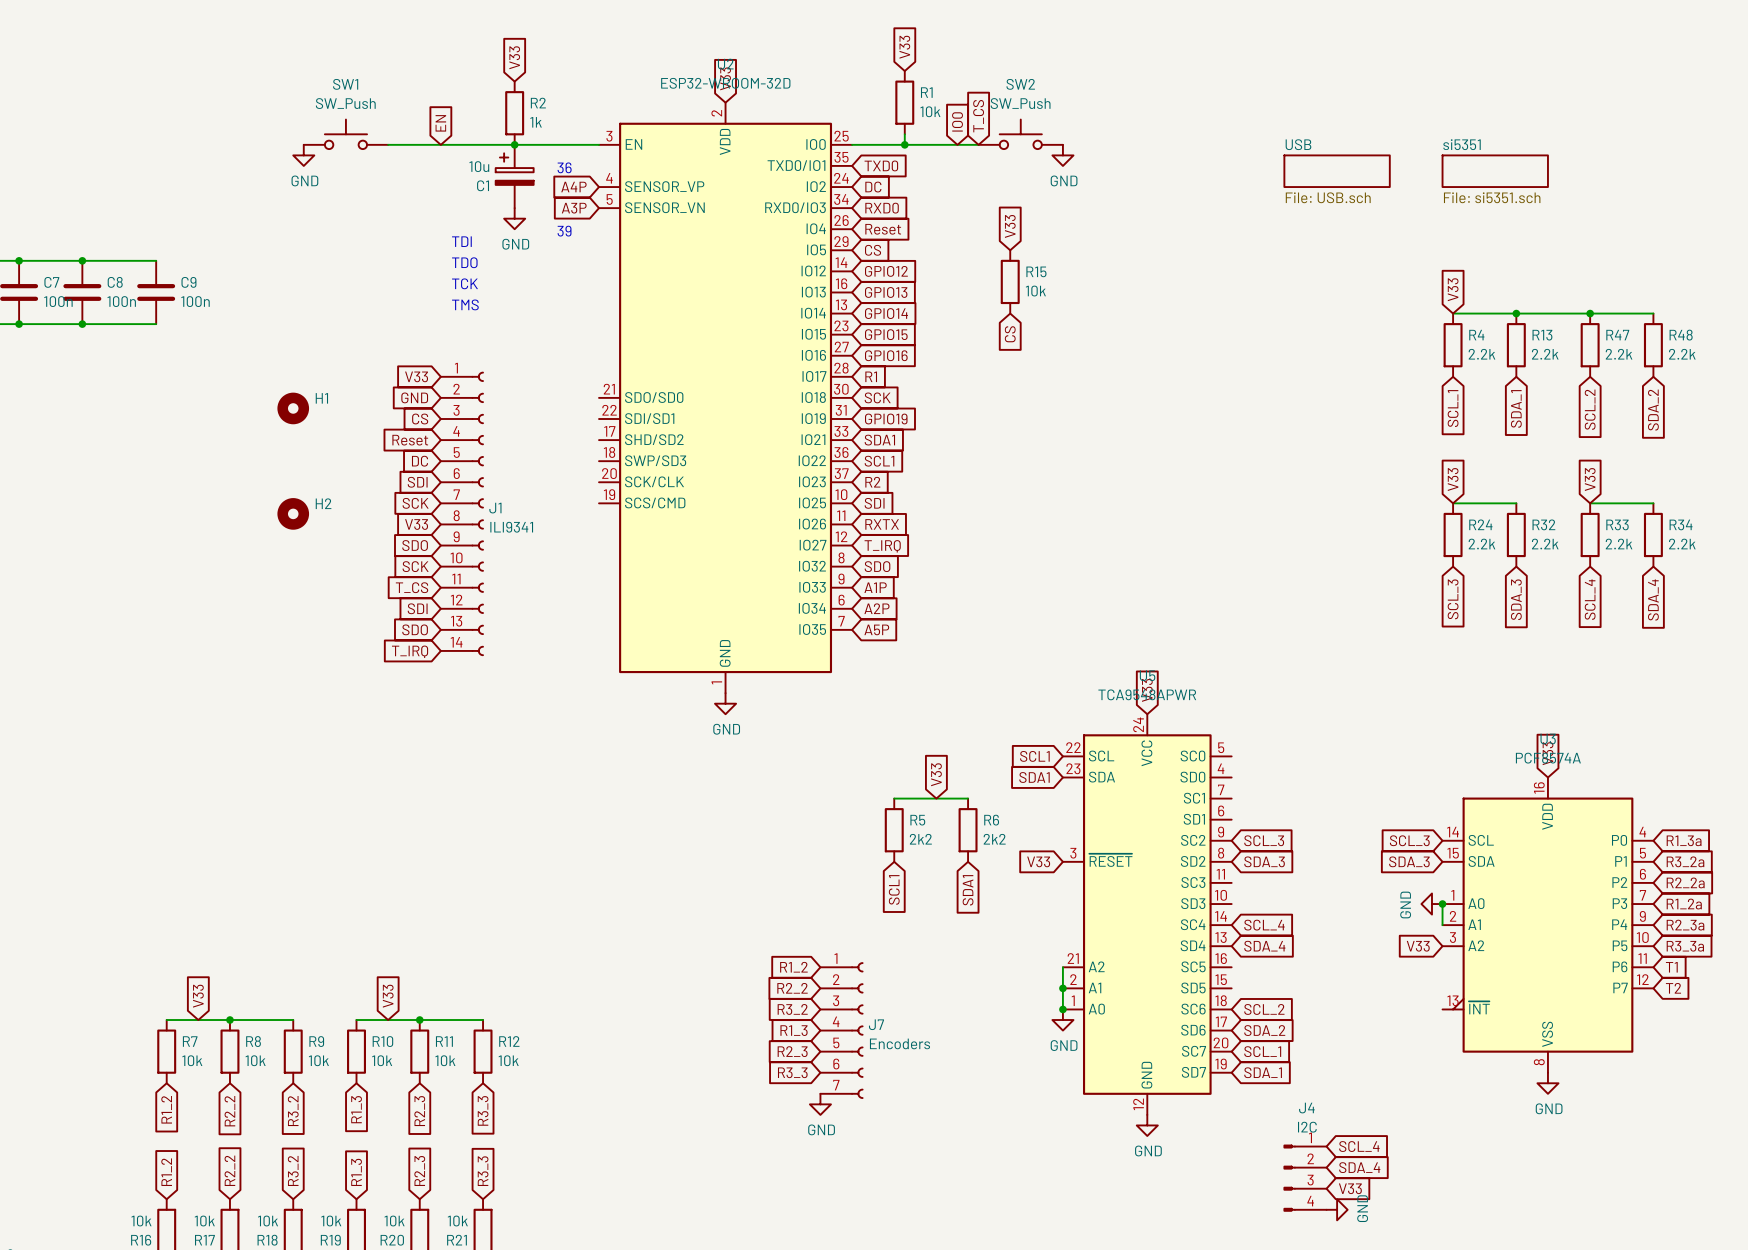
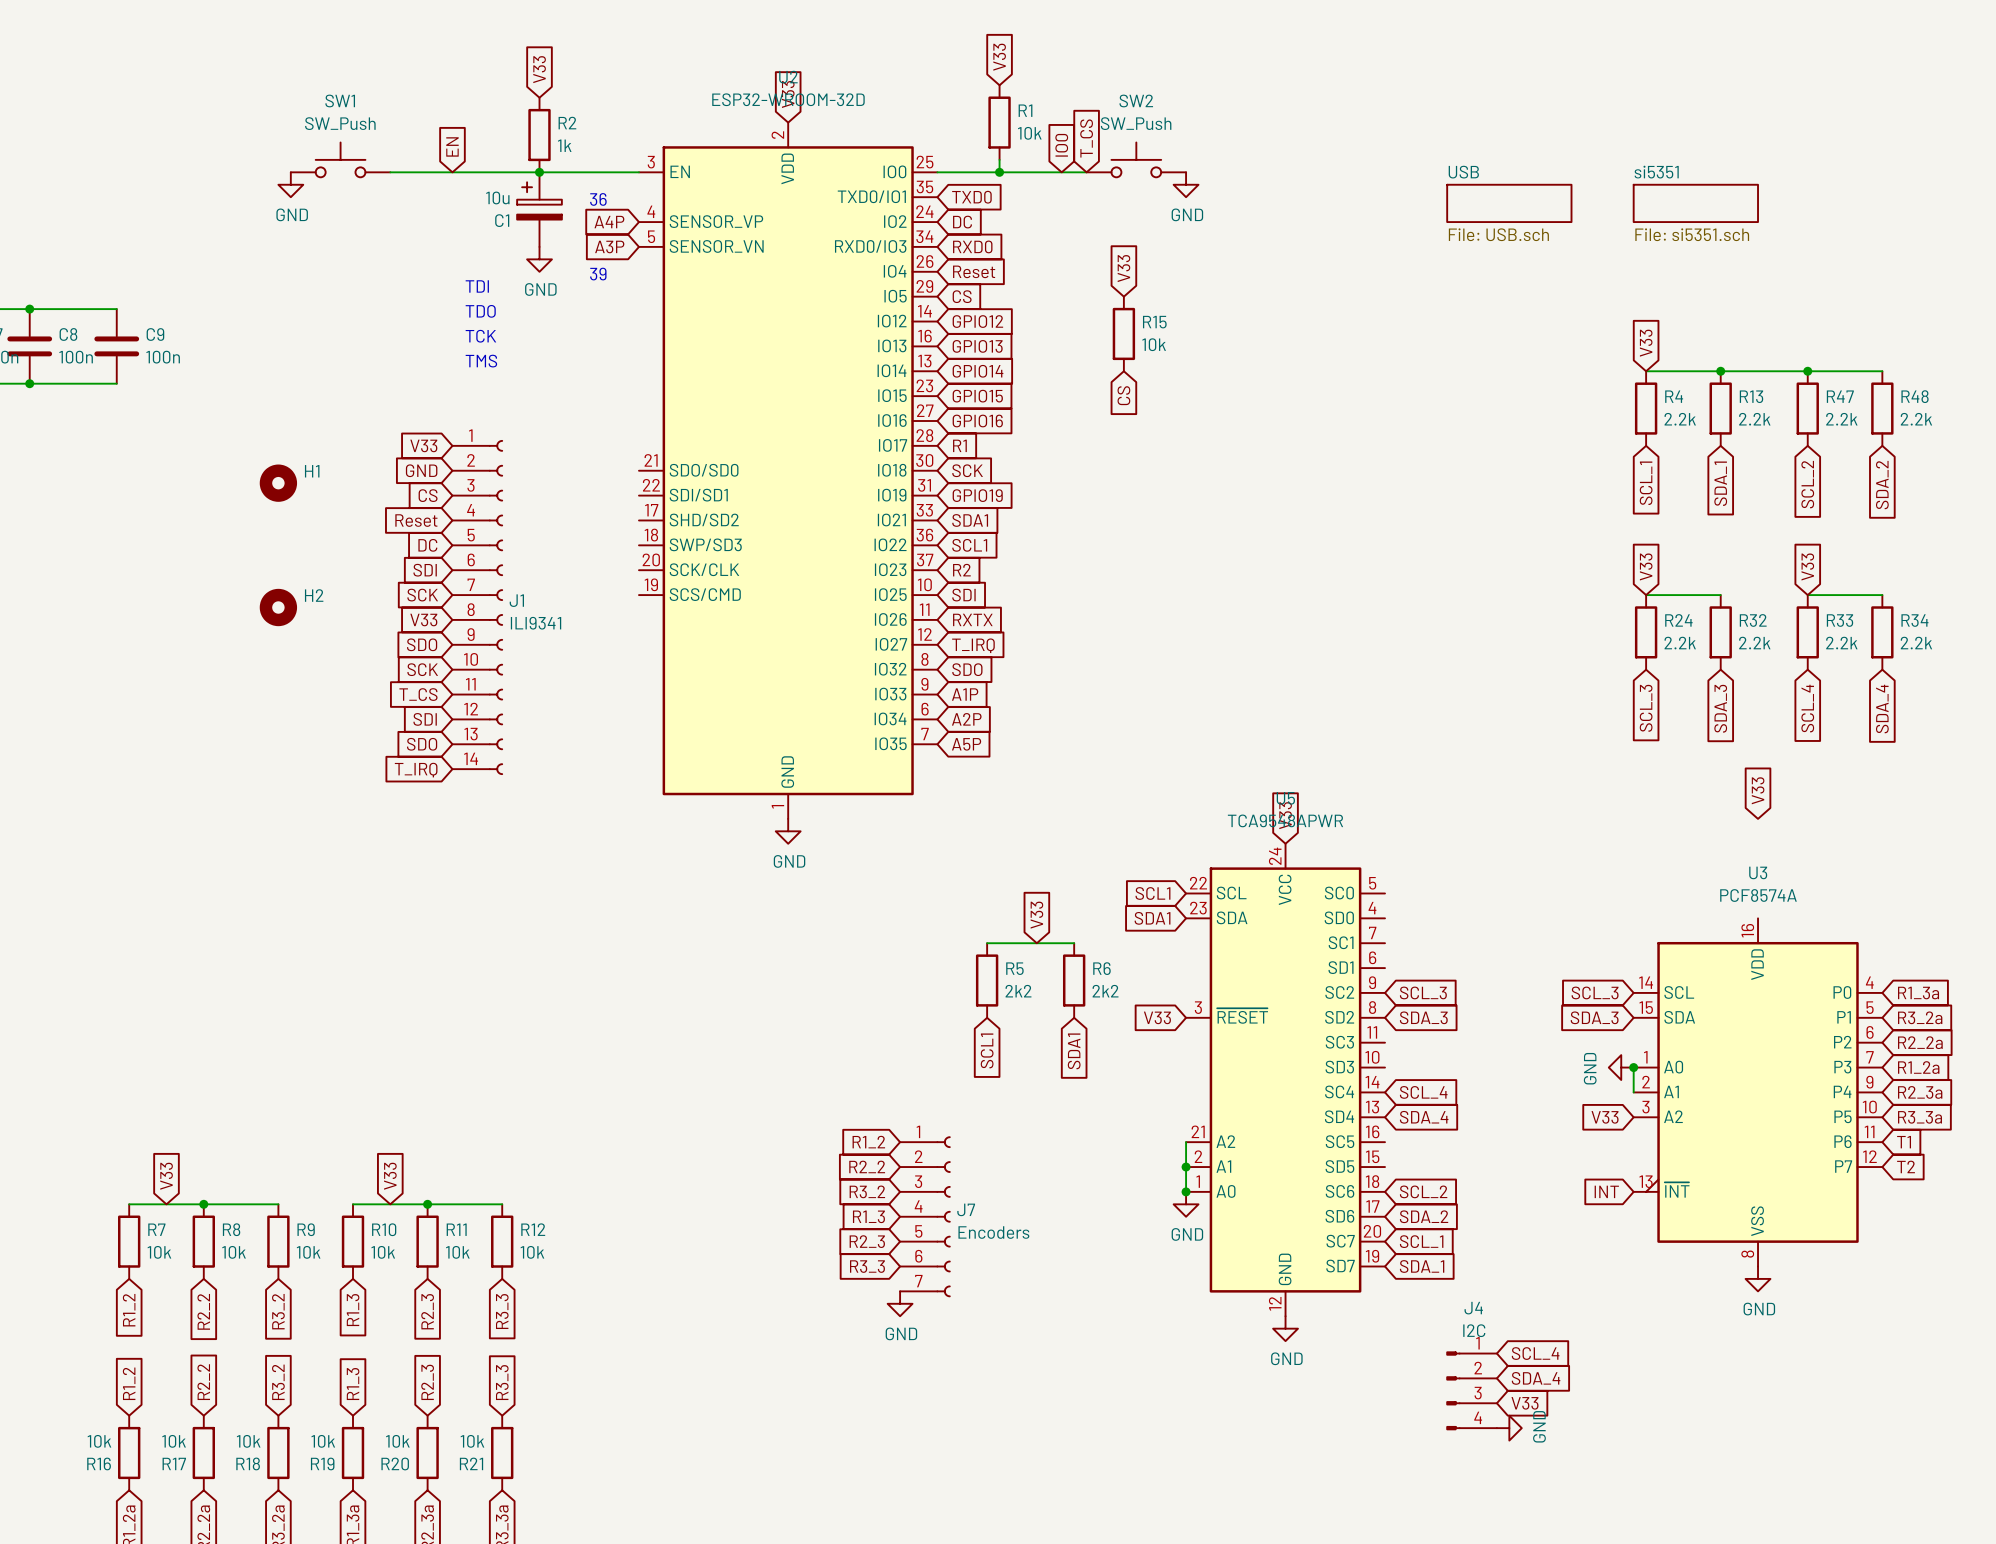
global label position: V33 (1548, 753) -> V33 (1758, 790)
global label: none -> INT (1606, 1191)

